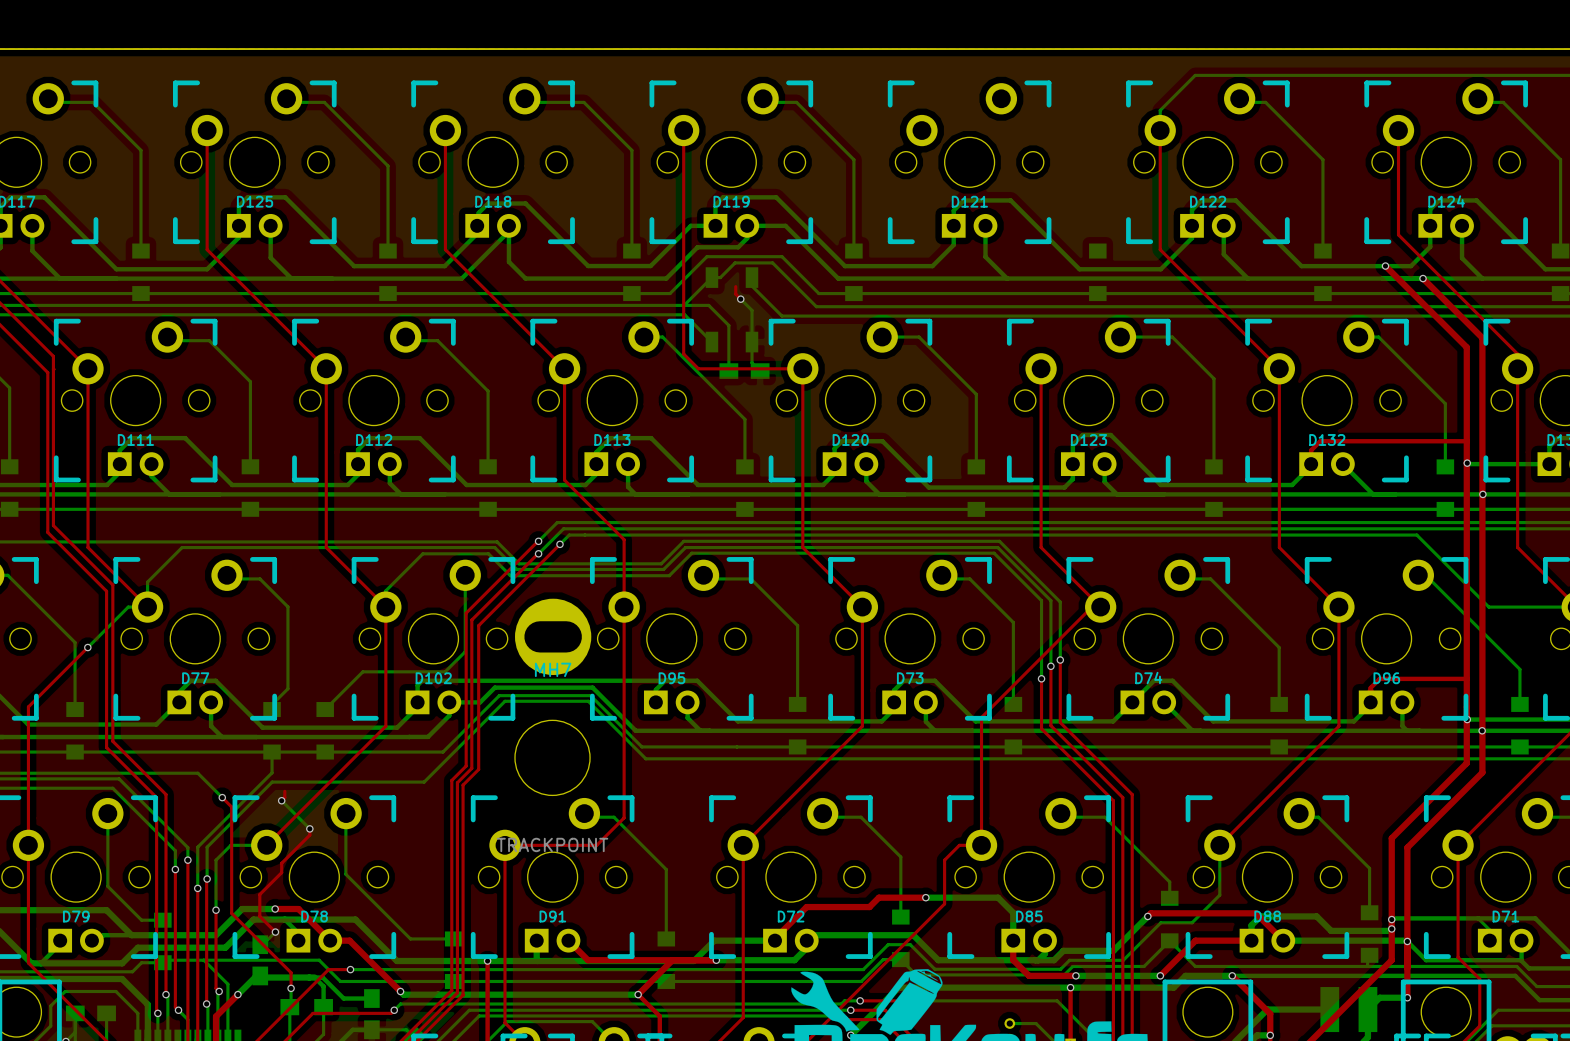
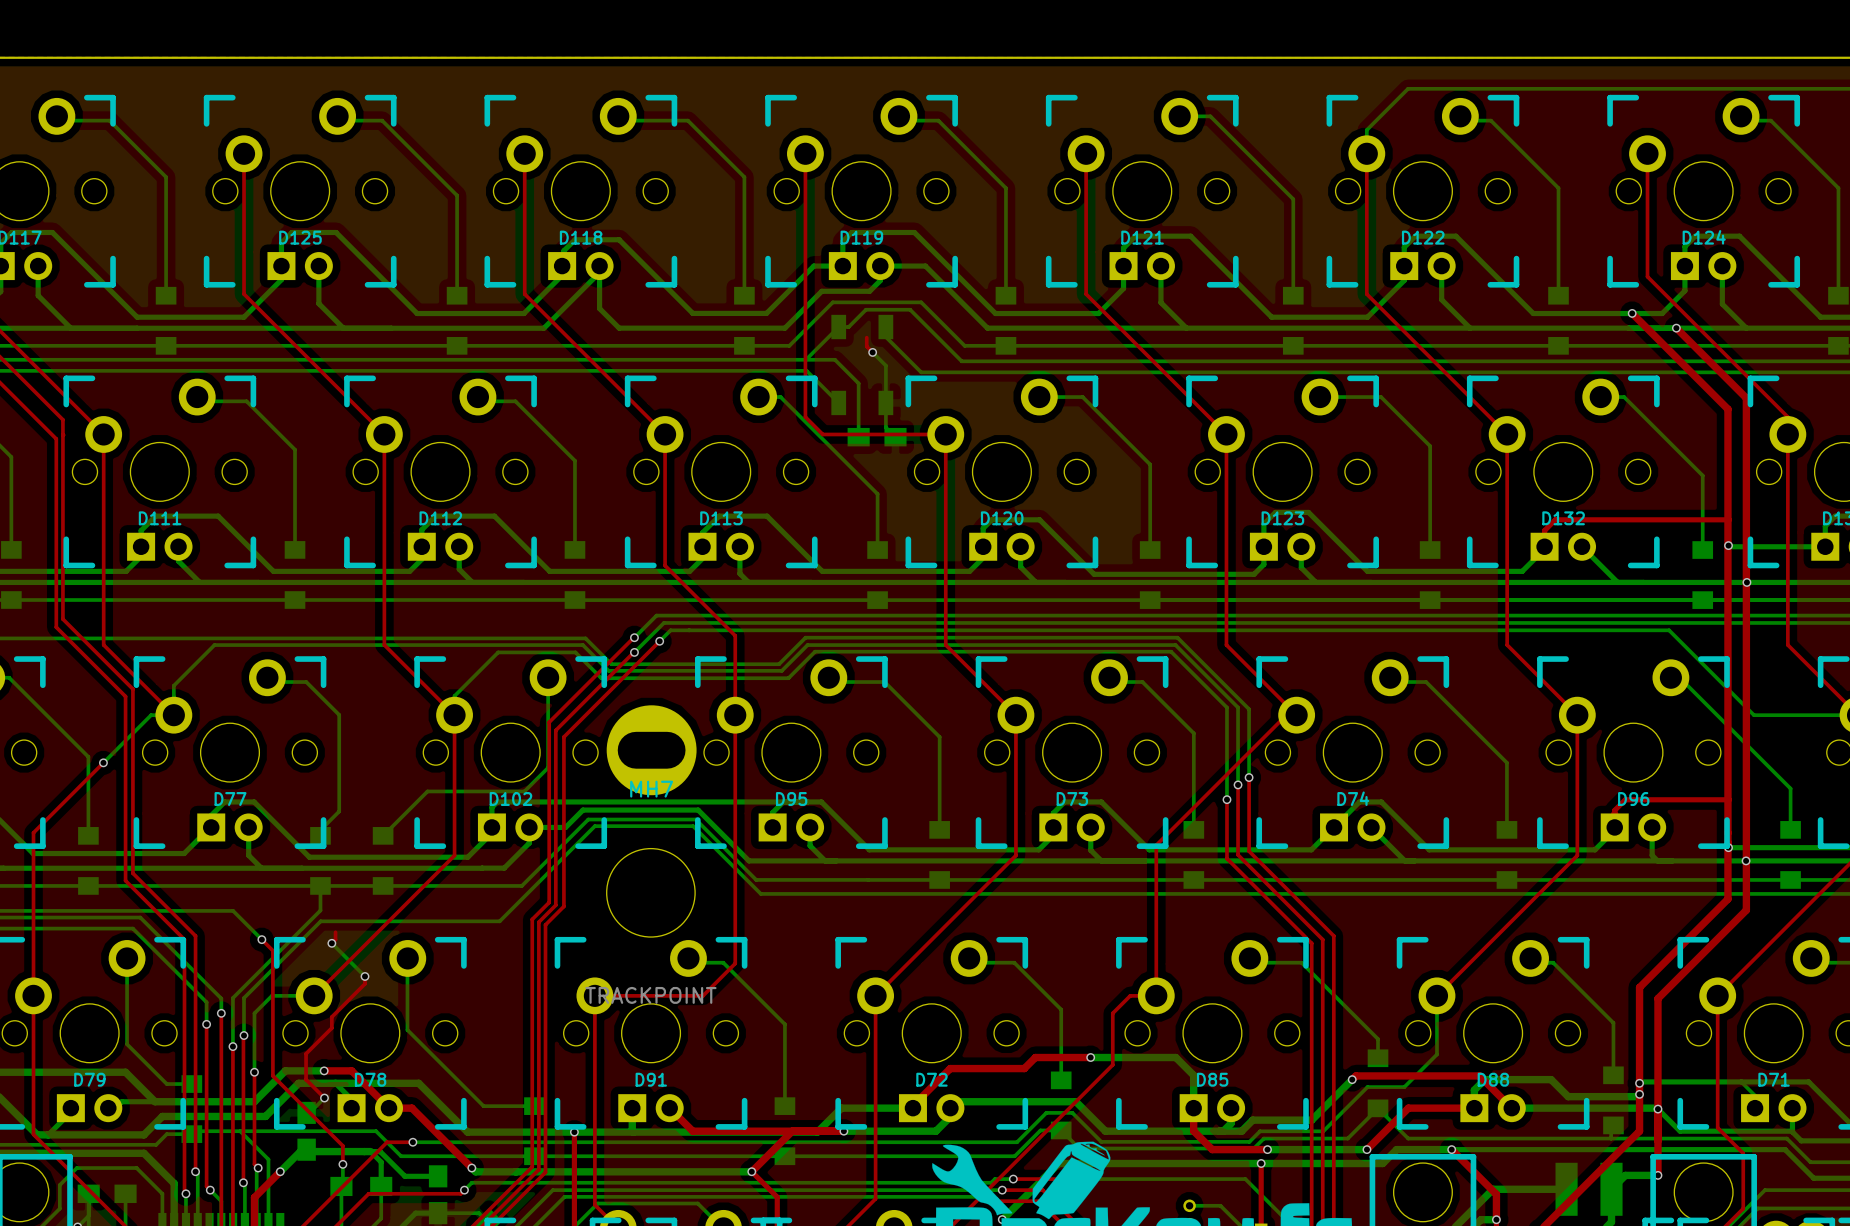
bottom track: none -> (1179, 116) (1210, 116) (1293, 199) (1293, 295)
top track: none -> (1086, 153) (1086, 294) (1226, 434)

